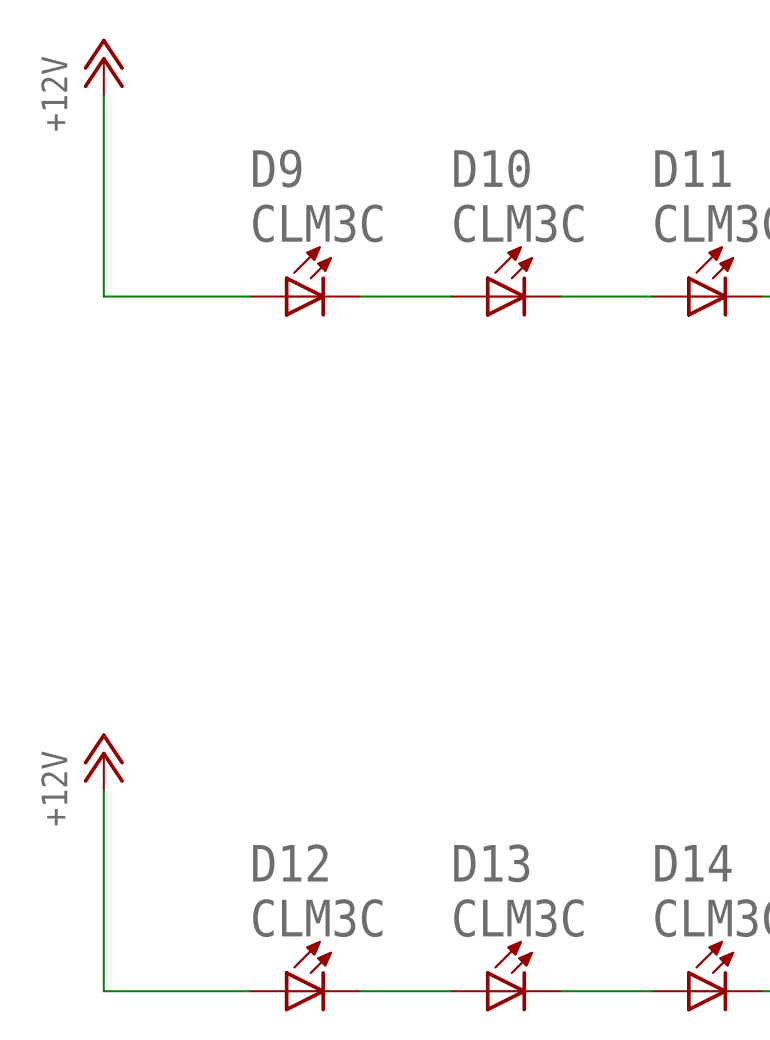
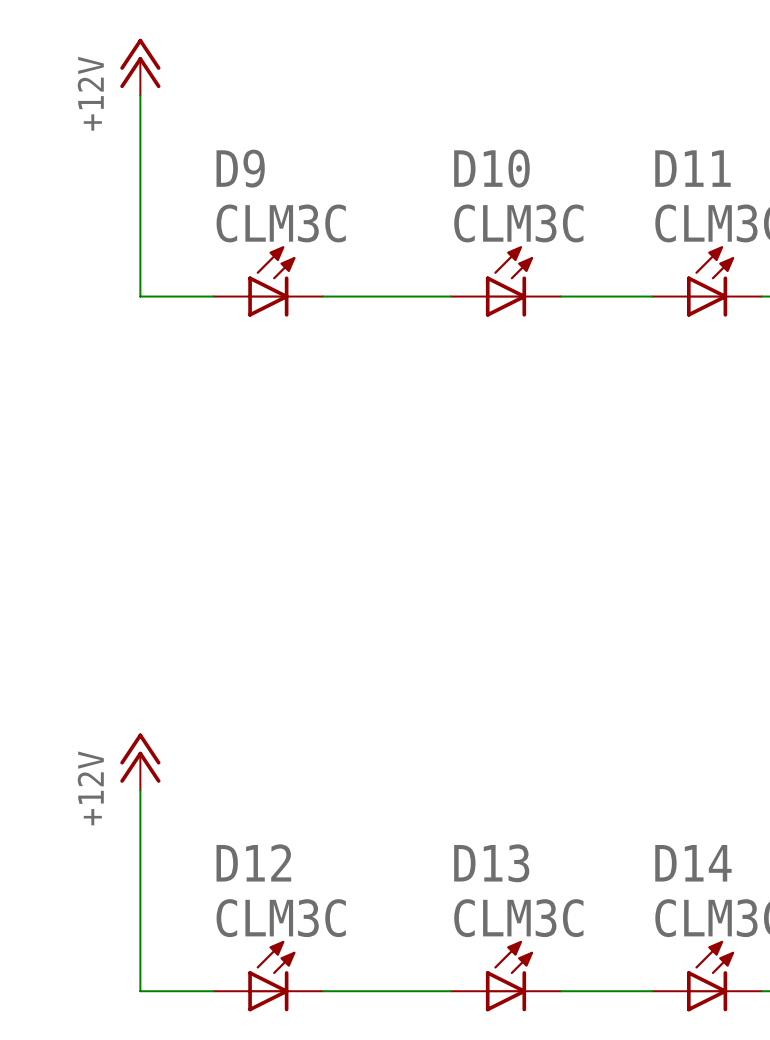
power symbol position: +12V (103, 67) -> +12V (140, 67)
wire: (103, 95) (103, 296) (140, 296) -> (140, 95) (140, 296)
D9 position: (304, 281) -> (268, 281)
power symbol position: +12V (103, 761) -> +12V (140, 761)
wire: (103, 790) (103, 991) (140, 991) -> (140, 790) (140, 991)
D12 position: (304, 976) -> (268, 976)

